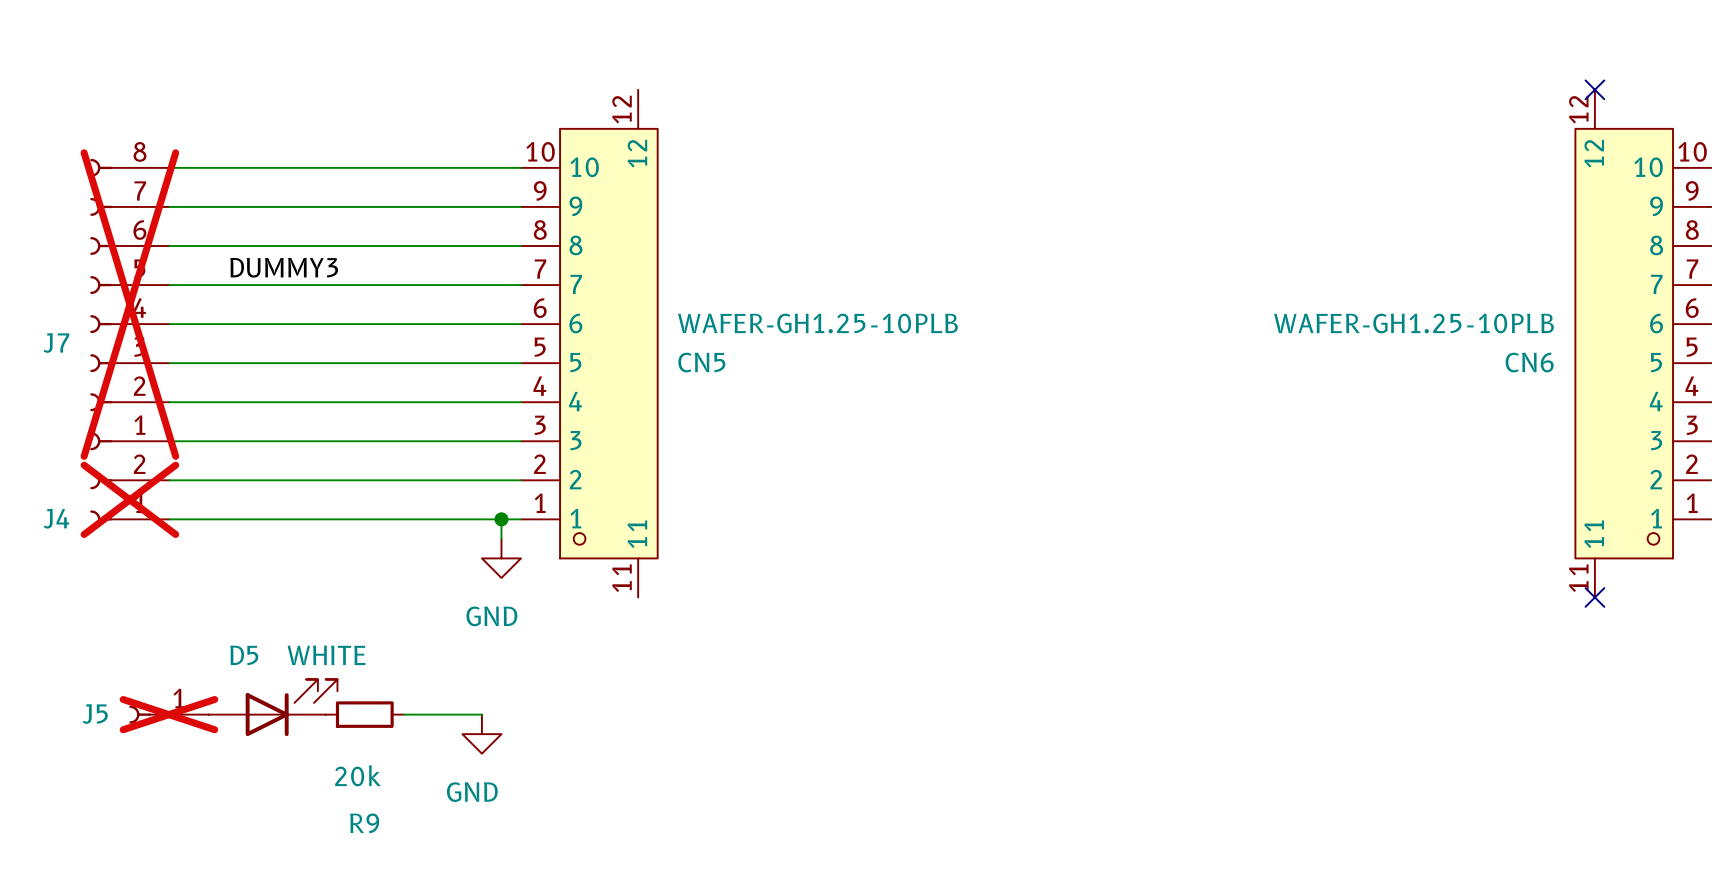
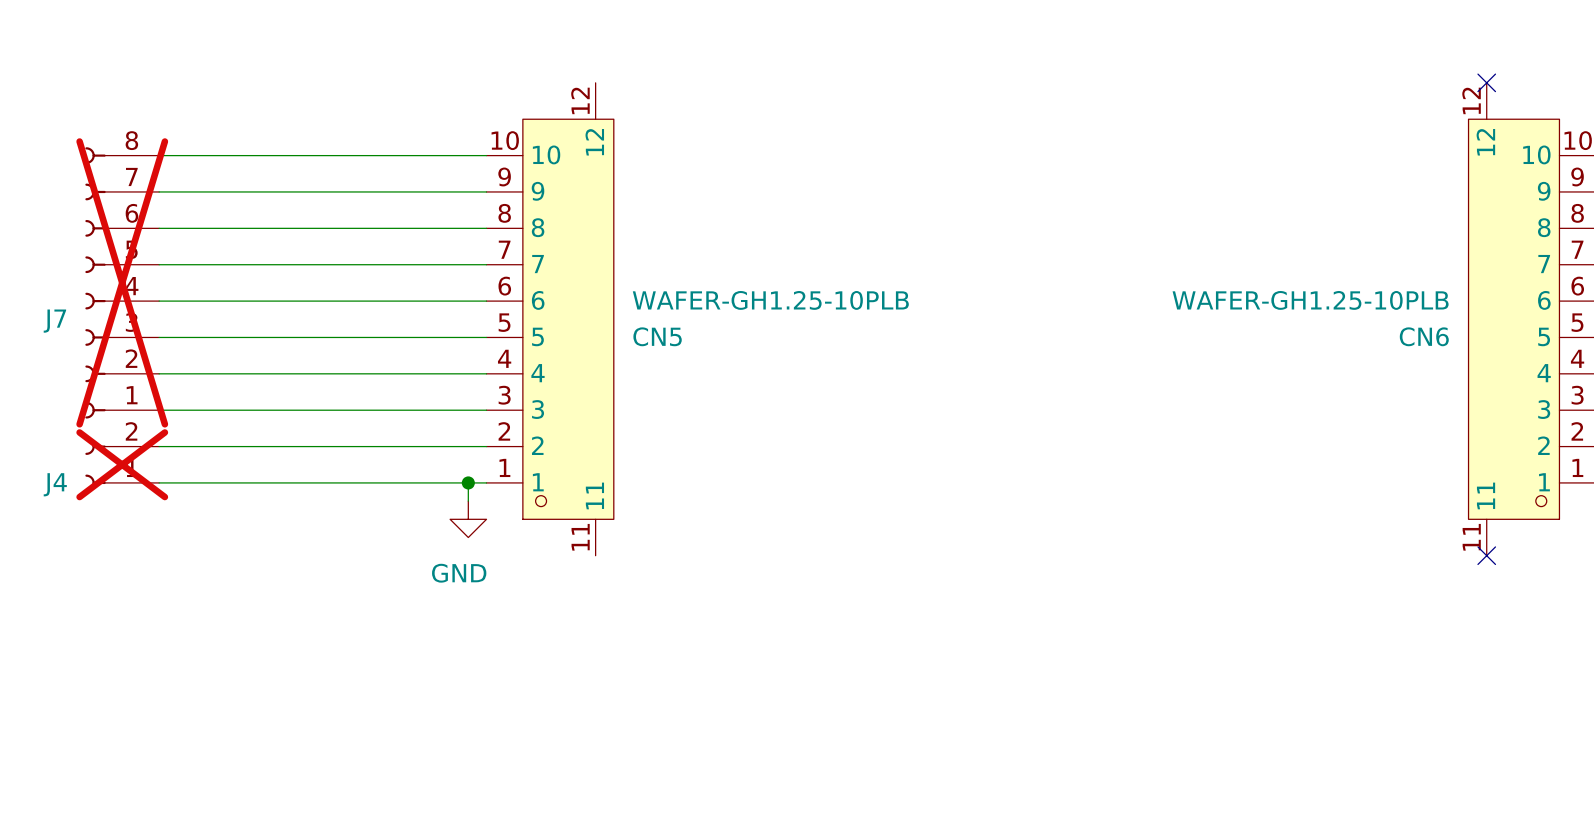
label: DUMMY3 (284, 267) -> none
D5: WHITE (273, 707) -> none
J5: (168, 714) -> none
R9: 20k (364, 714) -> none
wire: (403, 714) (481, 714) -> none
power symbol: GND (481, 734) -> none

